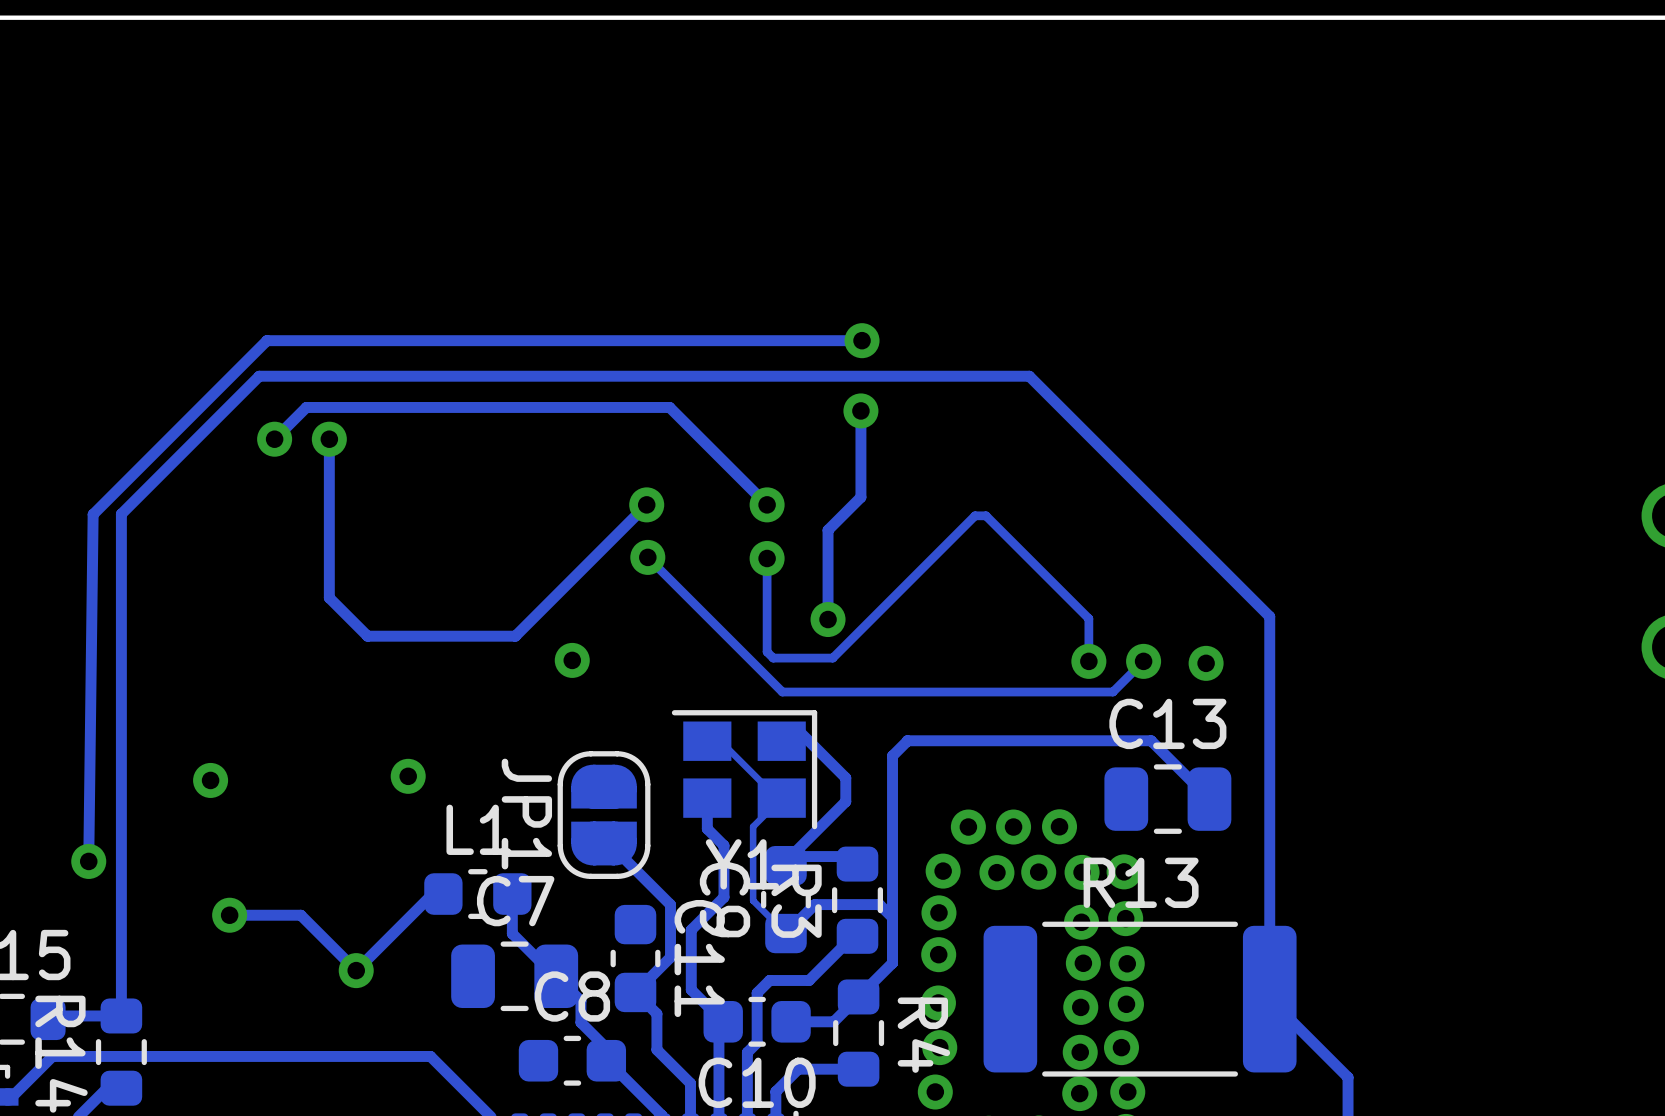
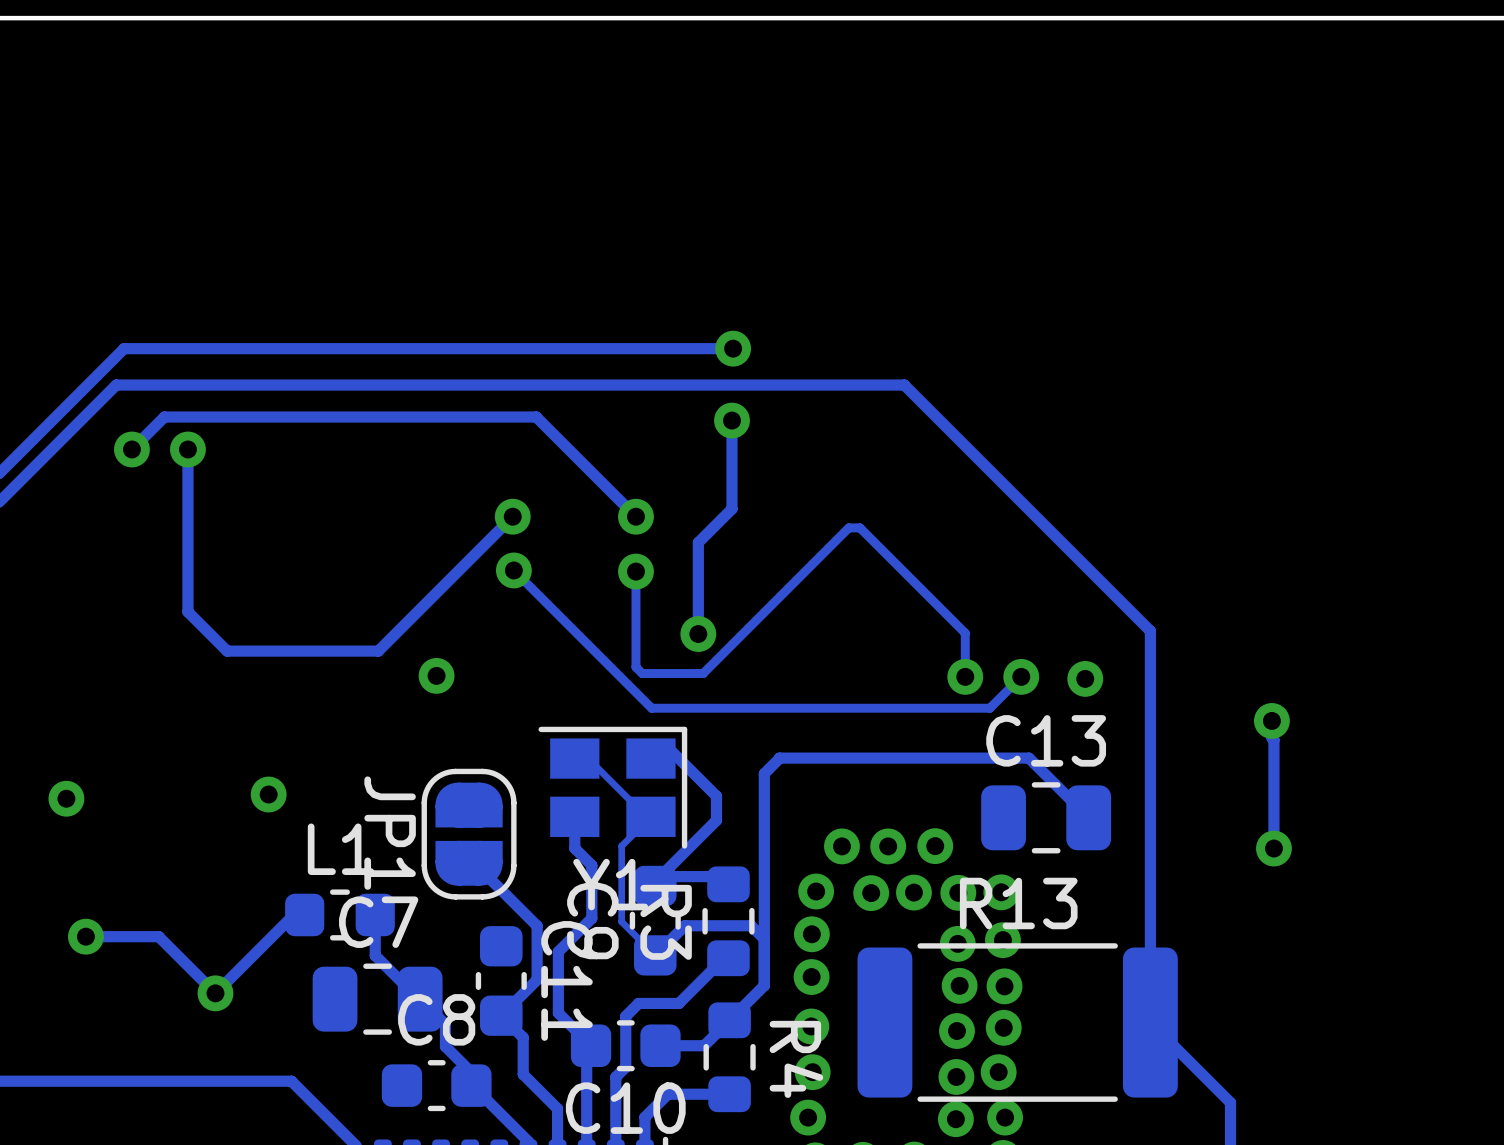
via: none -> (1271, 720)
track: none -> (1272, 738) (1271, 720) (1271, 737) (1273, 739) (1273, 848)
via: none -> (1273, 848)

